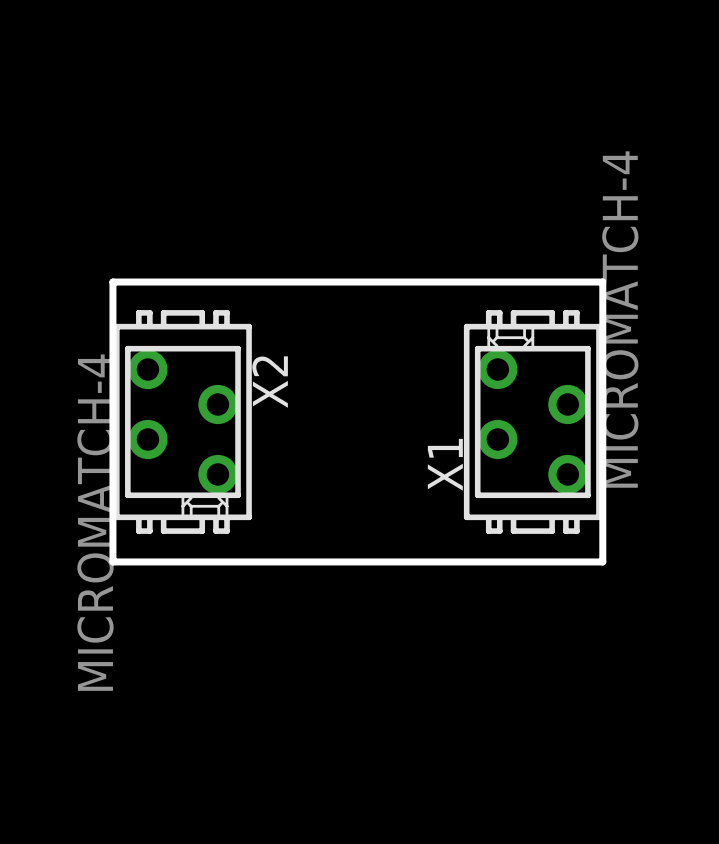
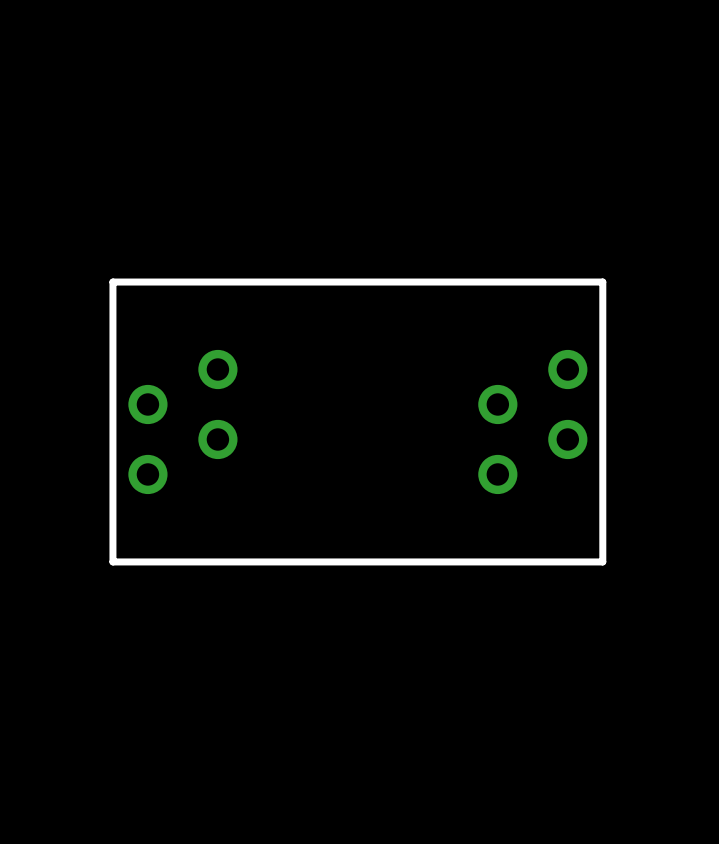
X2 side: bottom (182, 421) -> top (182, 421)
X1 side: bottom (532, 421) -> top (532, 421)

